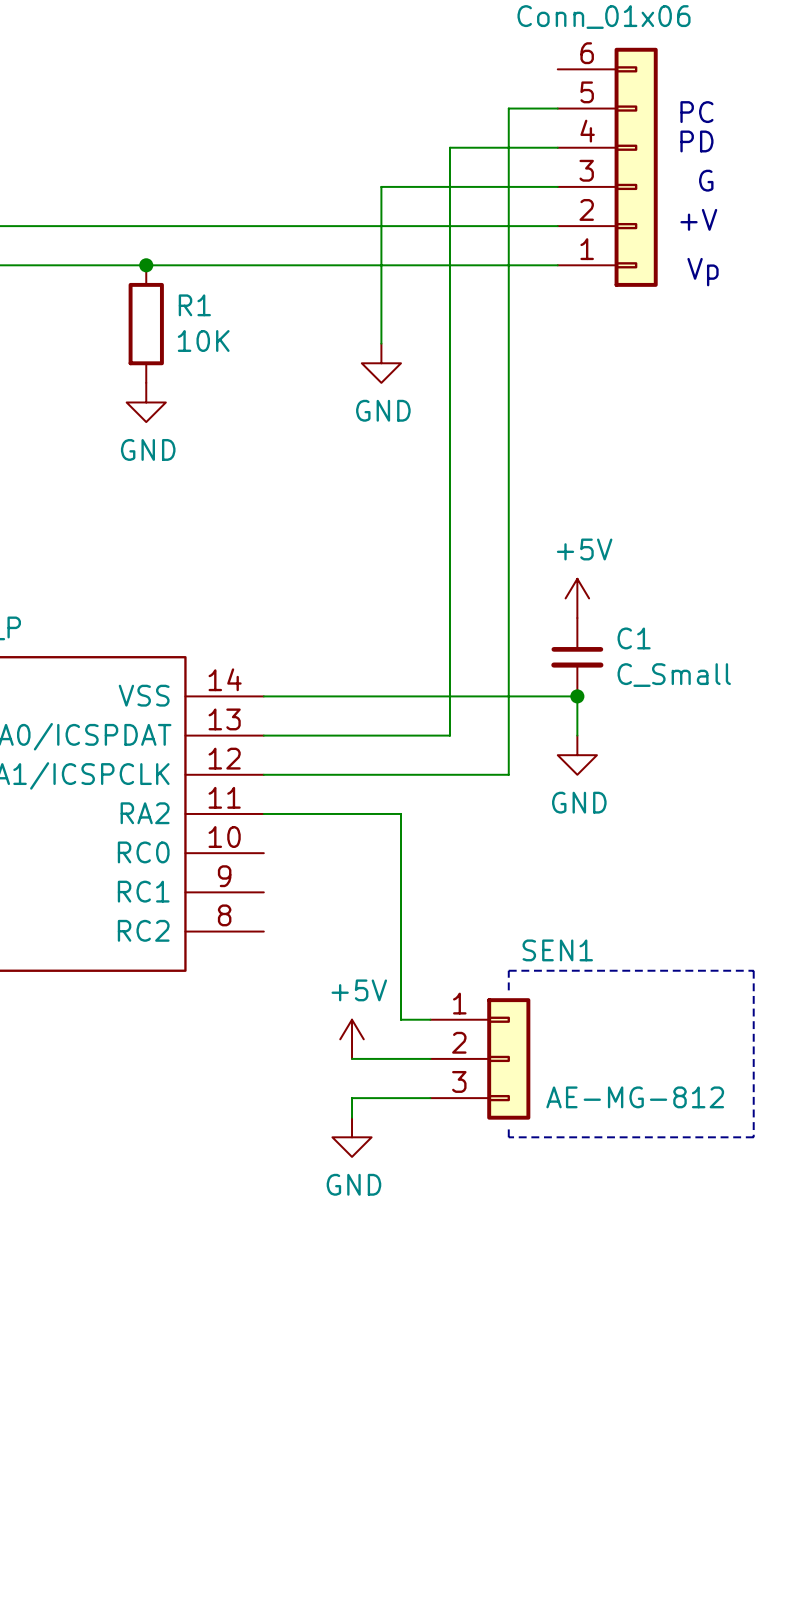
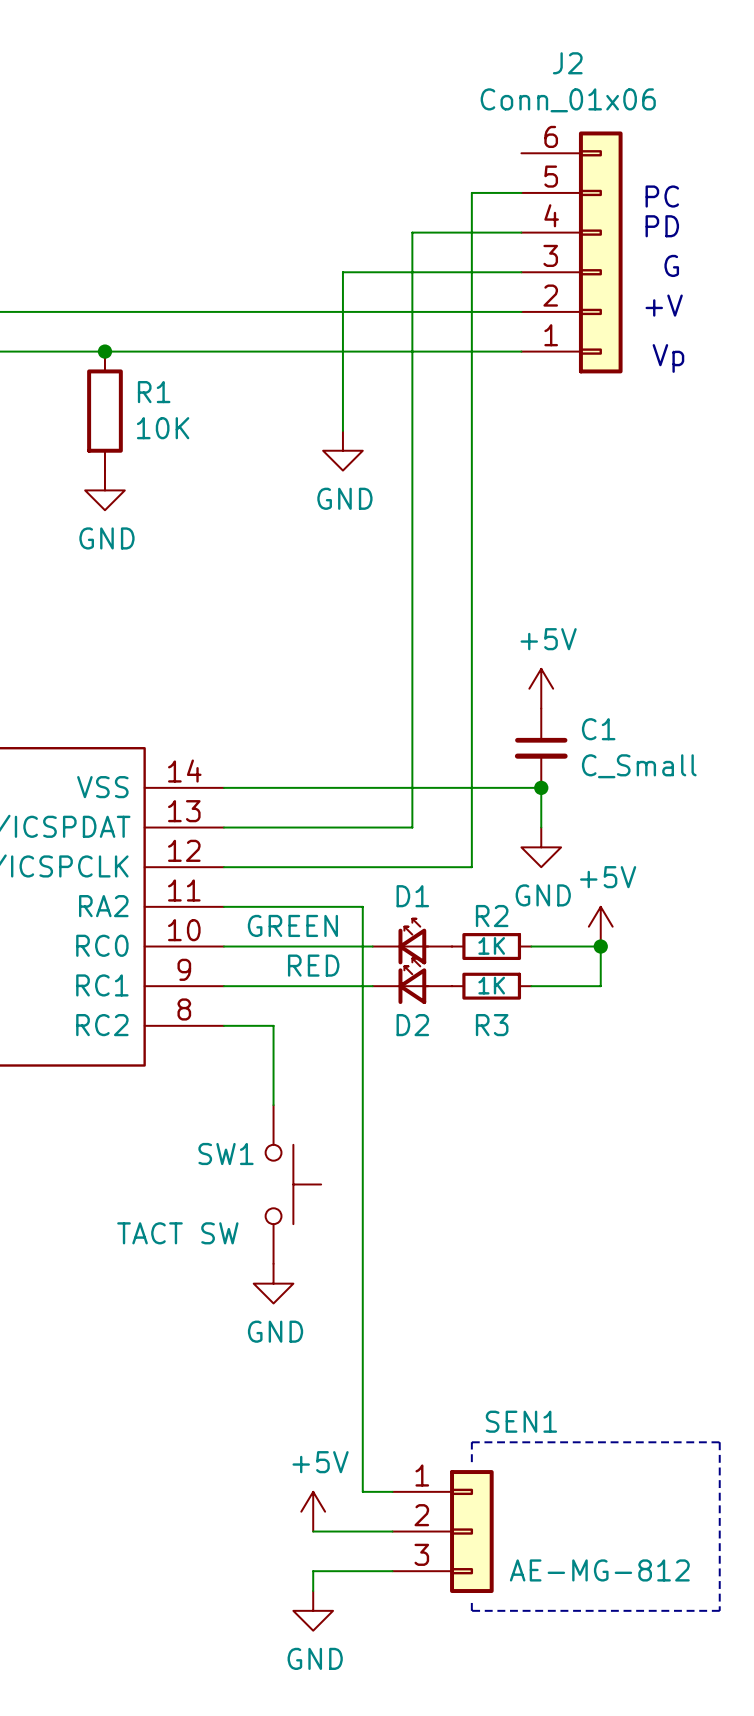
power symbol: none -> +5V (600, 926)
D1: none -> GREEN (412, 941)
wire: none -> (223, 946) (372, 946)
R2: none -> 1K (491, 946)
wire: none -> (531, 946) (600, 946) (600, 986) (531, 986)
junction: none -> (600, 946)
D2: none -> RED (412, 981)
wire: none -> (223, 986) (372, 986)
R3: none -> 1K (491, 986)
wire: none -> (223, 1025) (273, 1025) (273, 1105)
line: (508, 990) (508, 970) (753, 970) (753, 1137) (508, 1137) (508, 1127) -> (471, 1462) (471, 1442) (719, 1442) (719, 1610) (471, 1610) (471, 1600)
wire: (401, 1019) (430, 1019) -> (362, 1115) (362, 1491) (392, 1491)
power symbol: +5V (352, 1039) -> none
wire: (352, 1058) (430, 1058) -> (313, 1531) (392, 1531)
SEN1 position: (480, 1058) -> (443, 1531)
SW1: none -> TACT SW (293, 1184)
wire: (430, 1098) (352, 1098) (352, 1117) -> (392, 1571) (313, 1571) (313, 1591)
power symbol position: GND (352, 1137) -> GND (273, 1283)
power symbol: none -> +5V (313, 1511)
power symbol: none -> GND (313, 1610)

